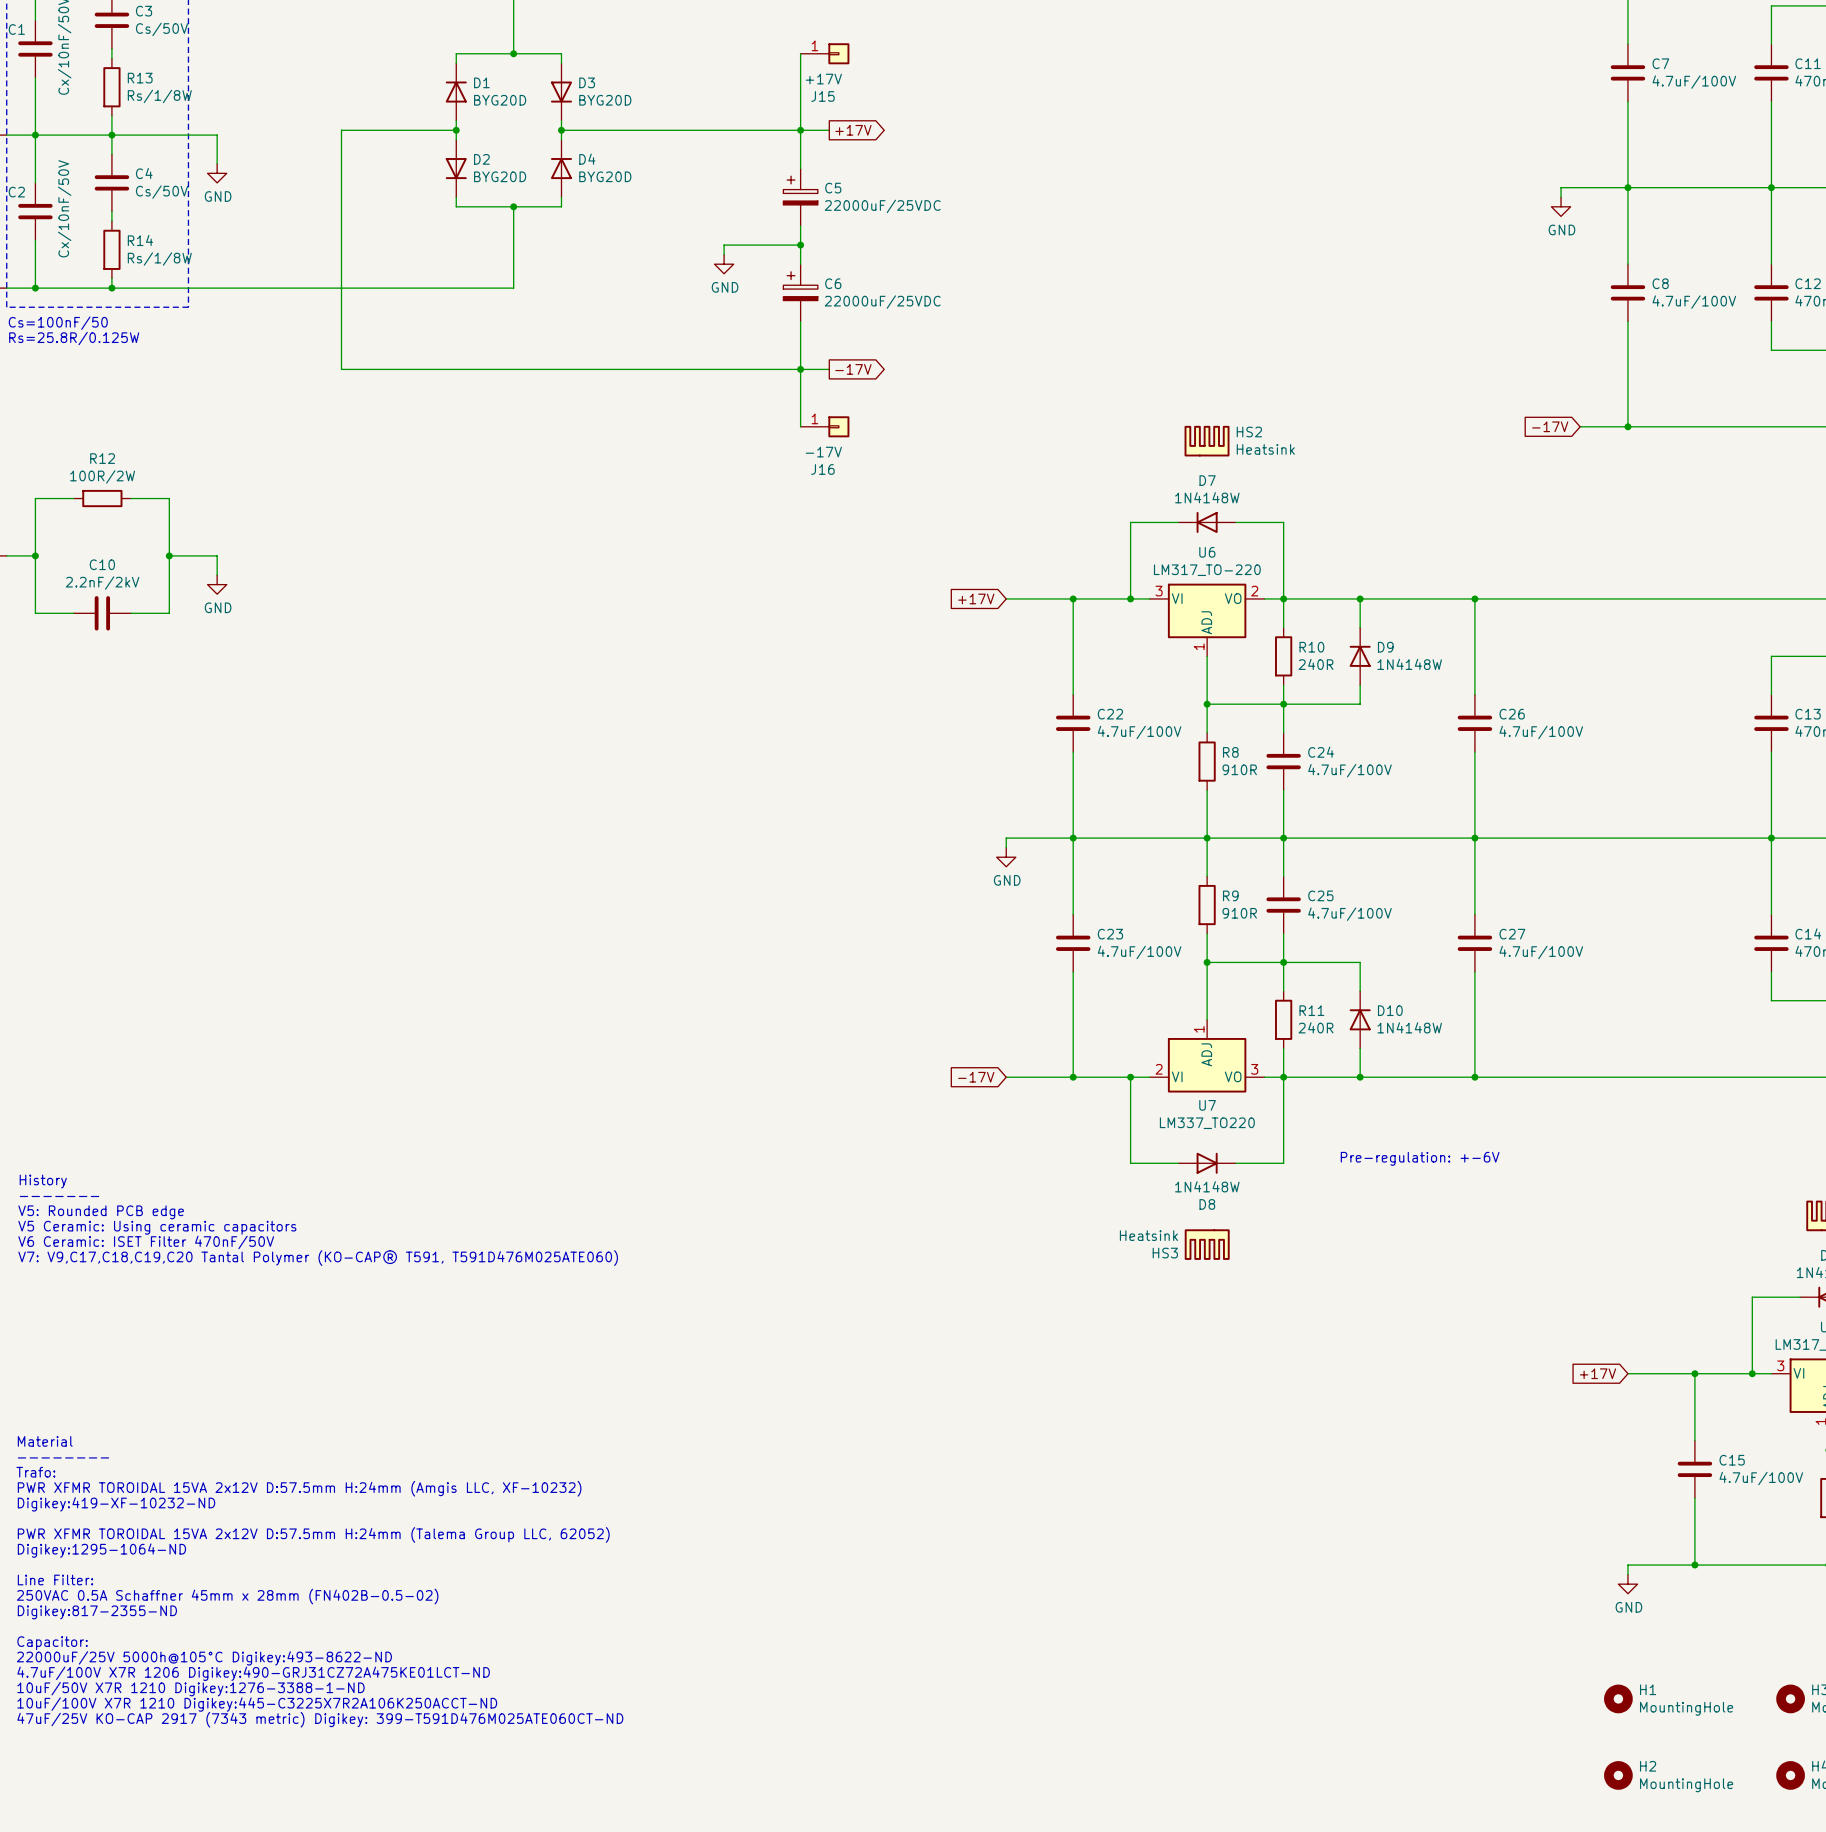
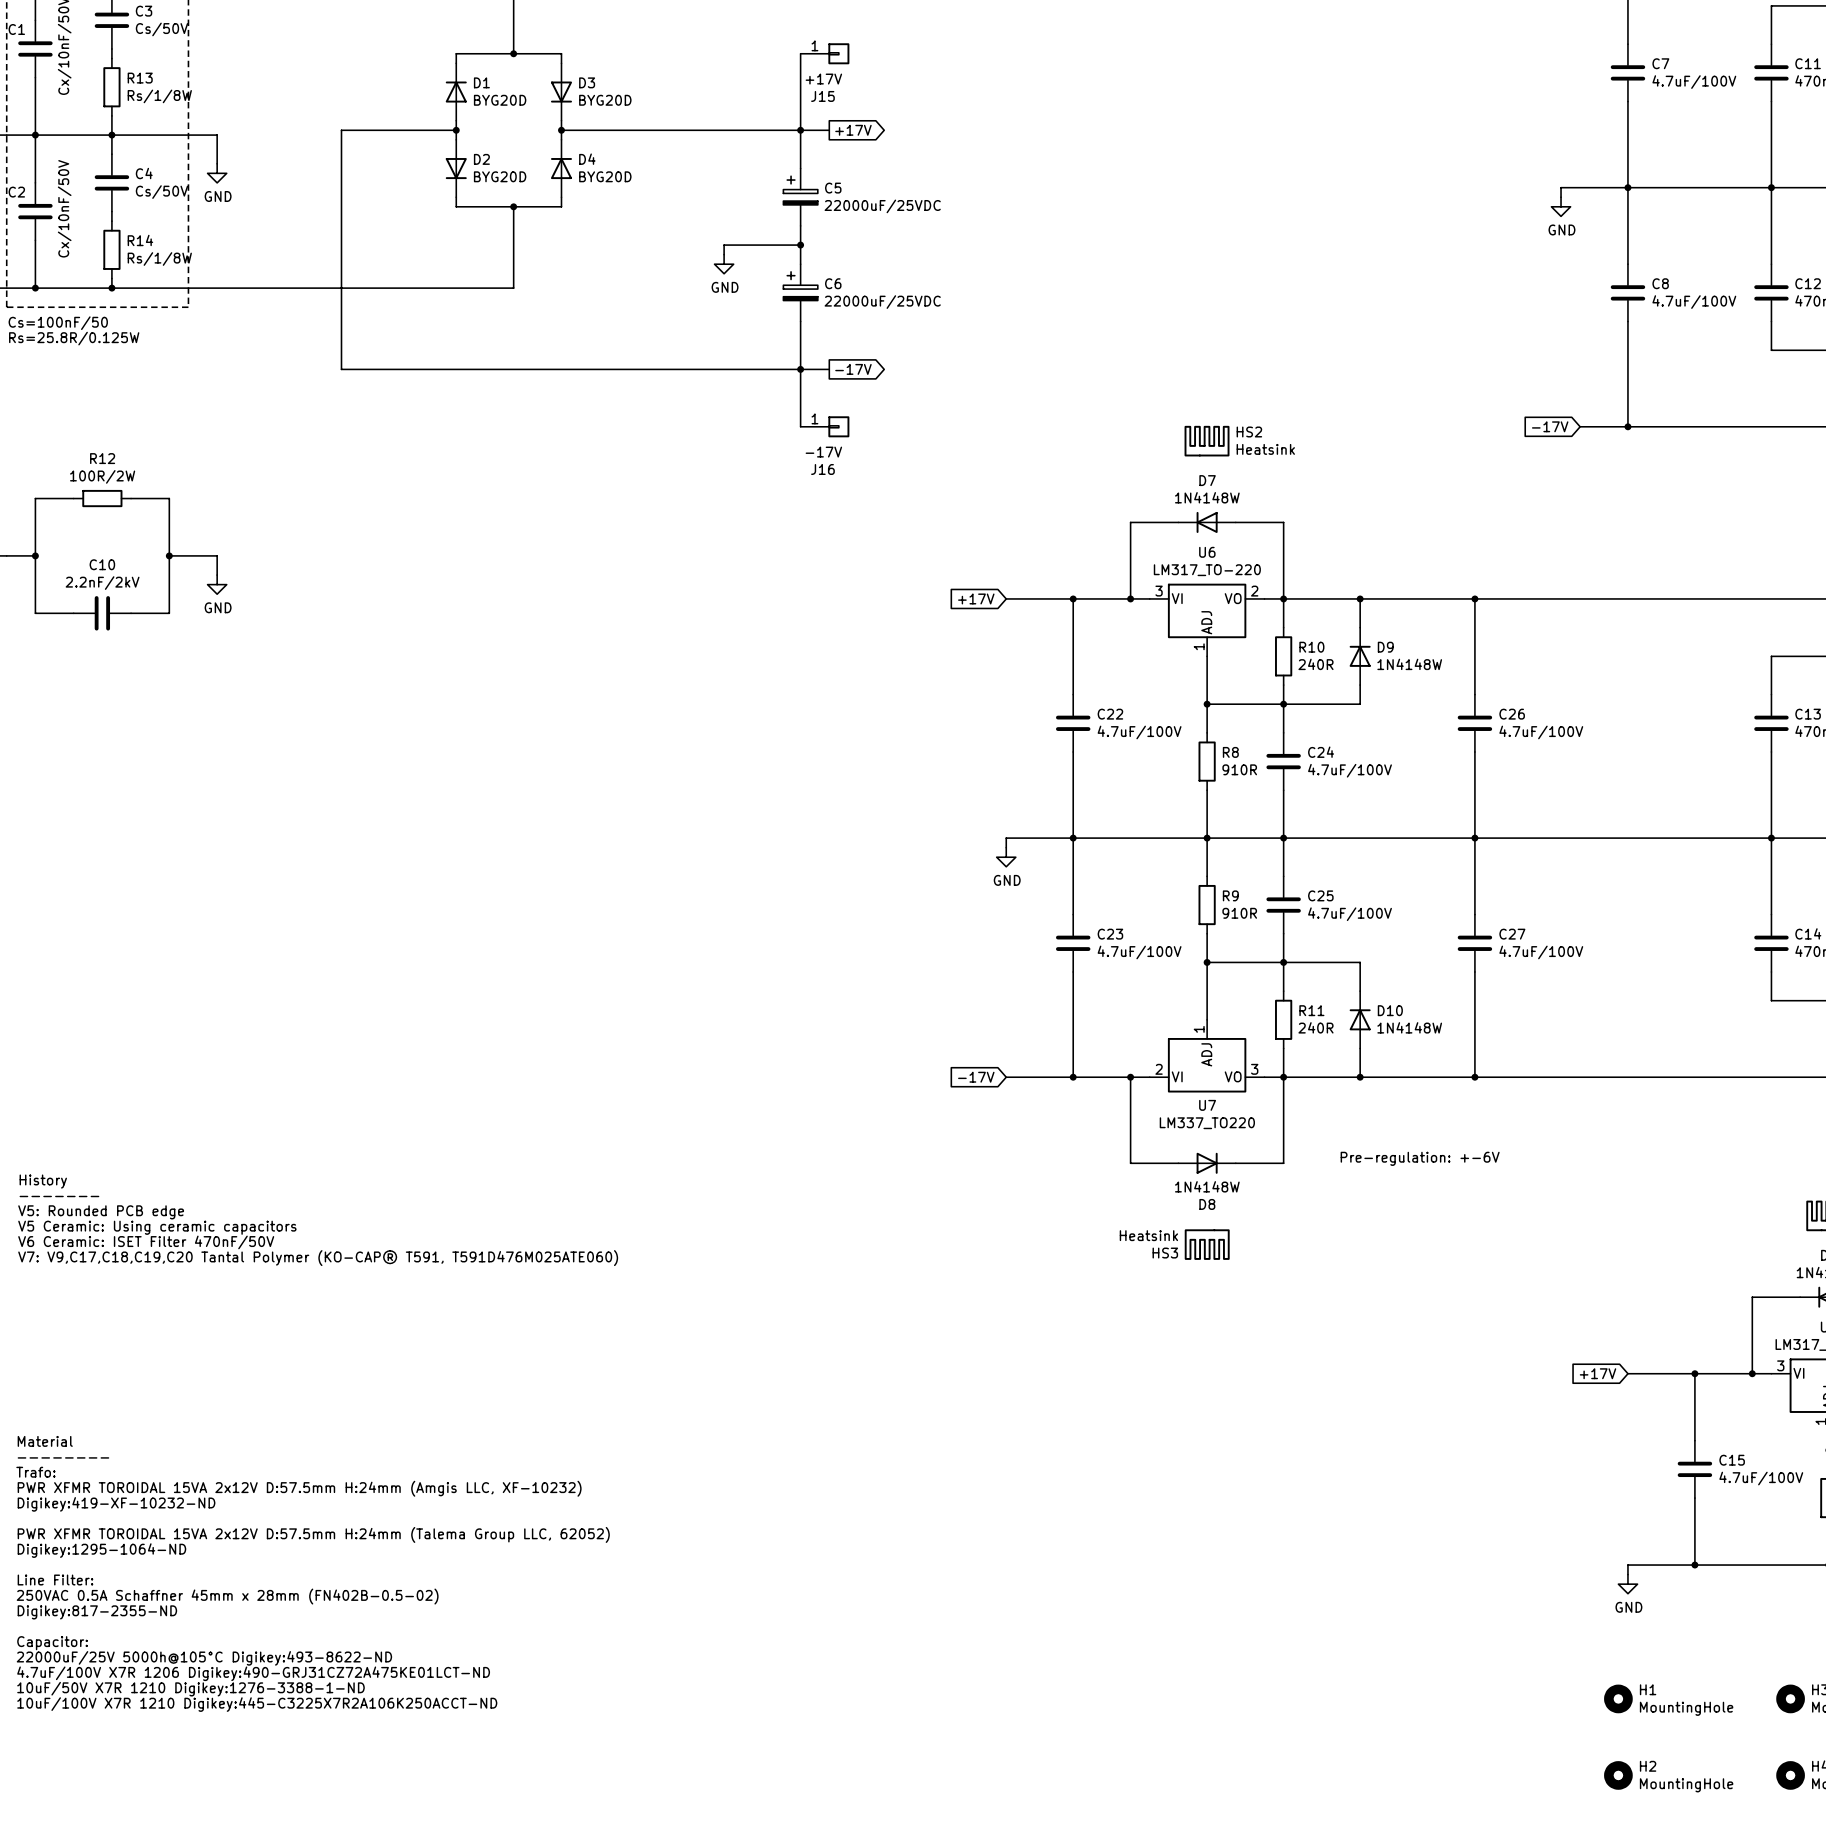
text: 47uF/25V KO-CAP 2917 (7343 metric) Digikey: 399-T591D476M025ATE060CT-ND (320, 1719) -> none

